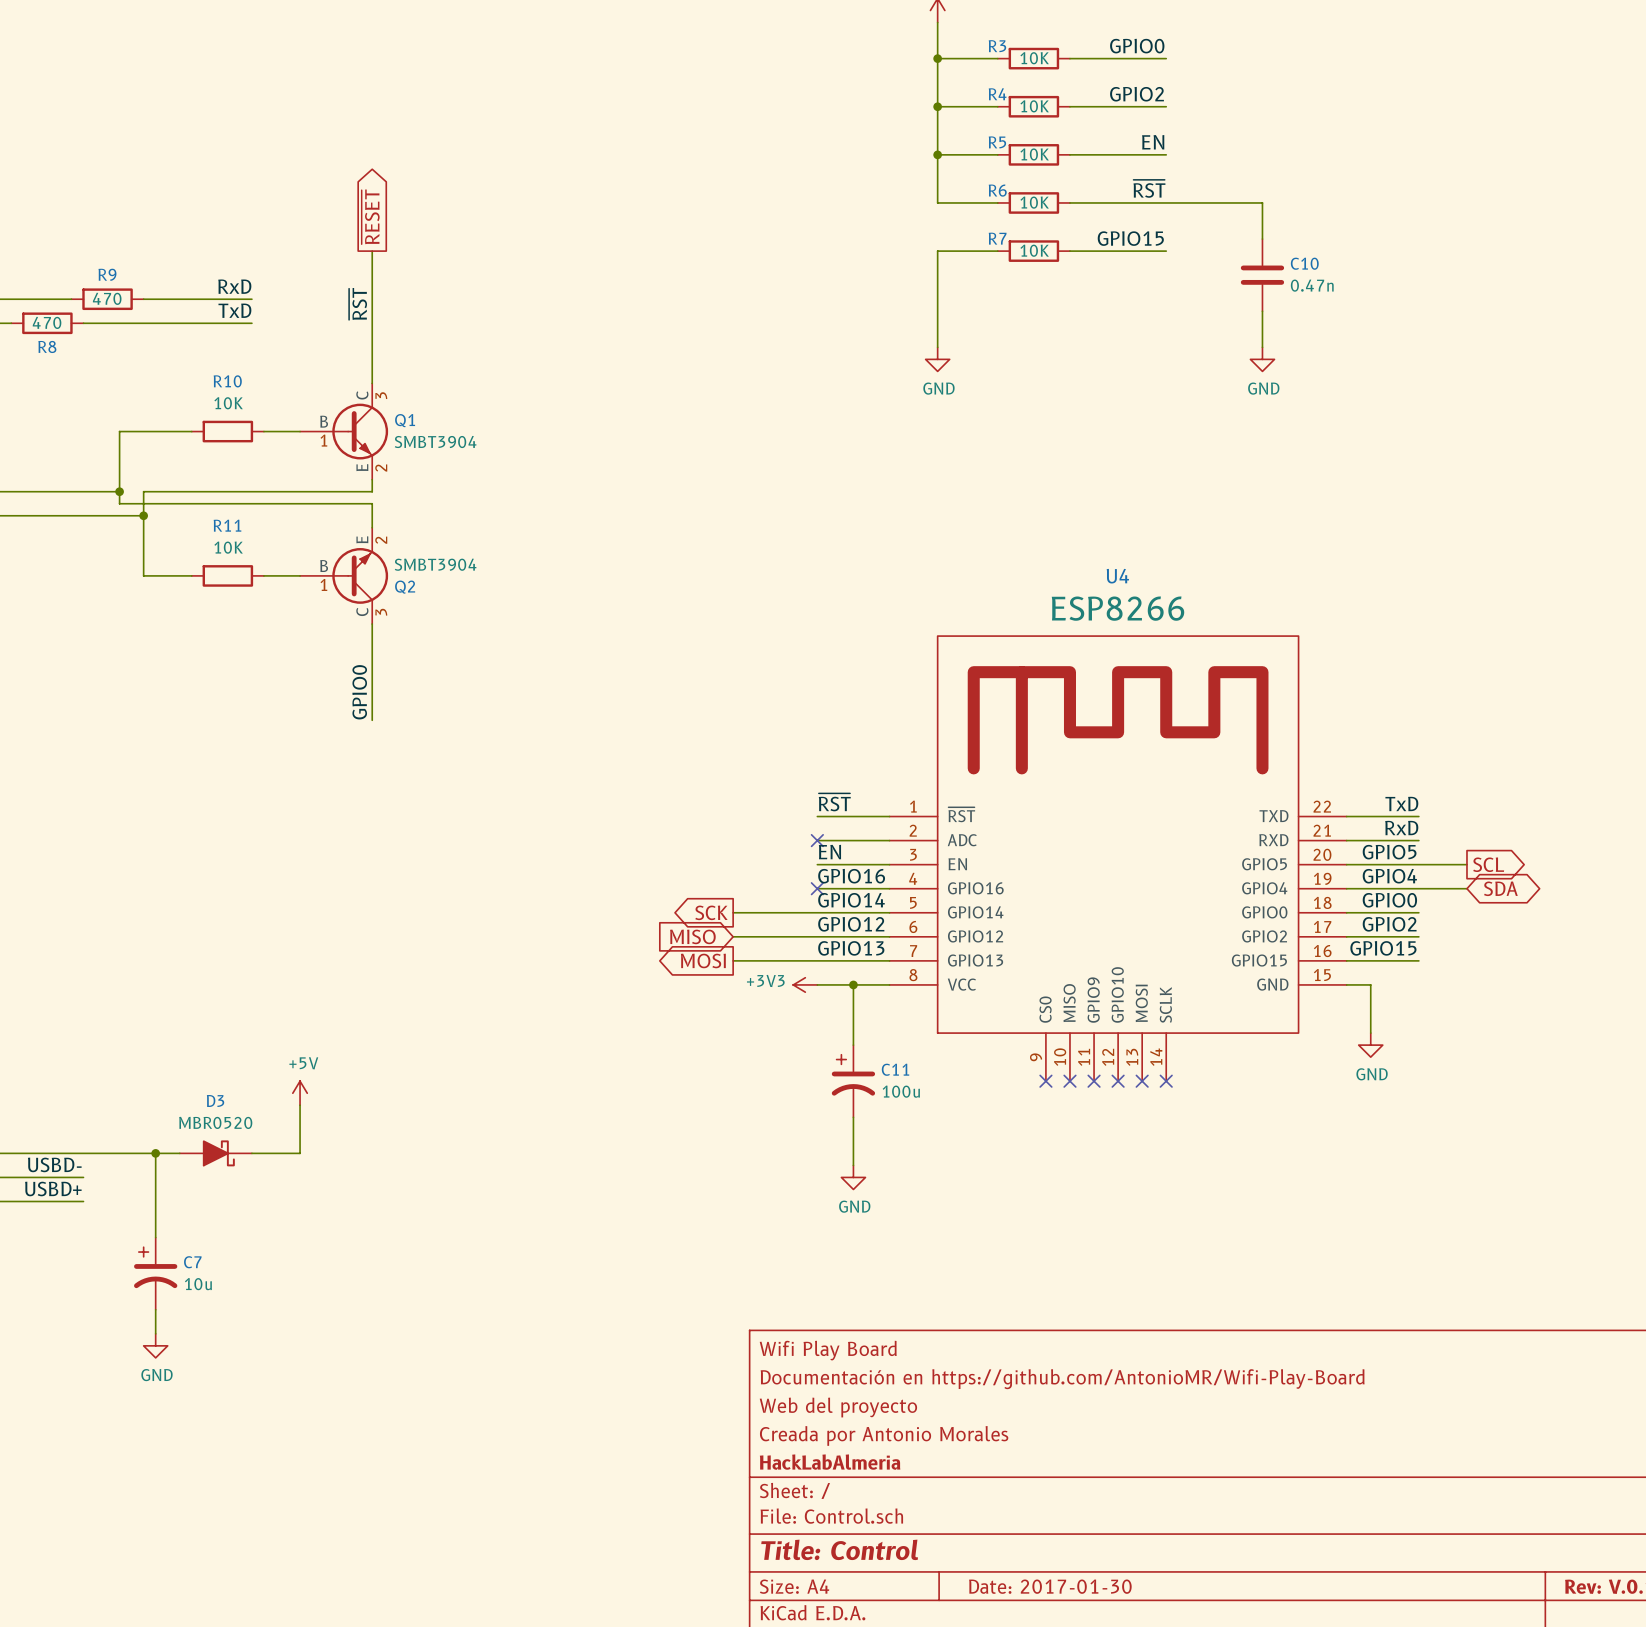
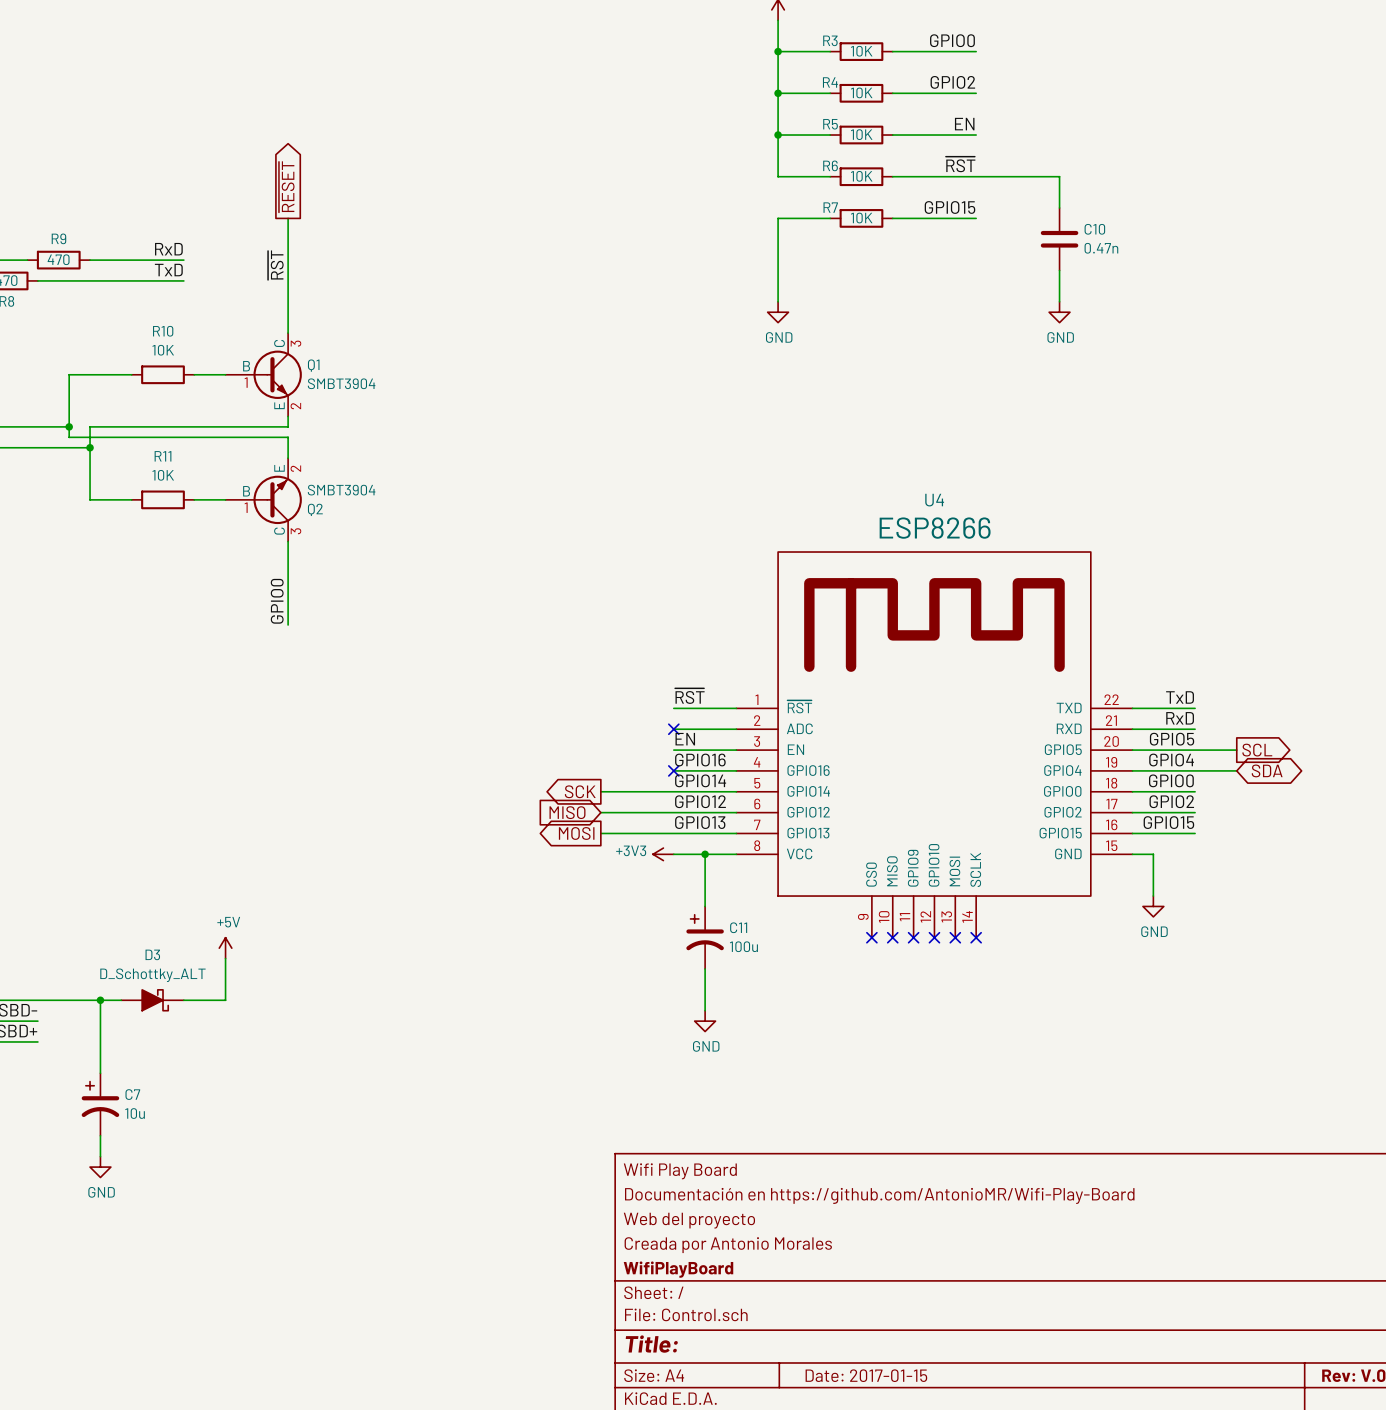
D3 value: MBR0520 (215, 1122) -> D_Schottky_ALT (152, 975)
title block: HackLabAlmeria (830, 1462) -> WifiPlayBoard (678, 1269)
title block: Title: Control (839, 1549) -> Title: (651, 1344)
title block: Date: 2017-01-30 (1050, 1586) -> Date: 2017-01-15 (866, 1375)

